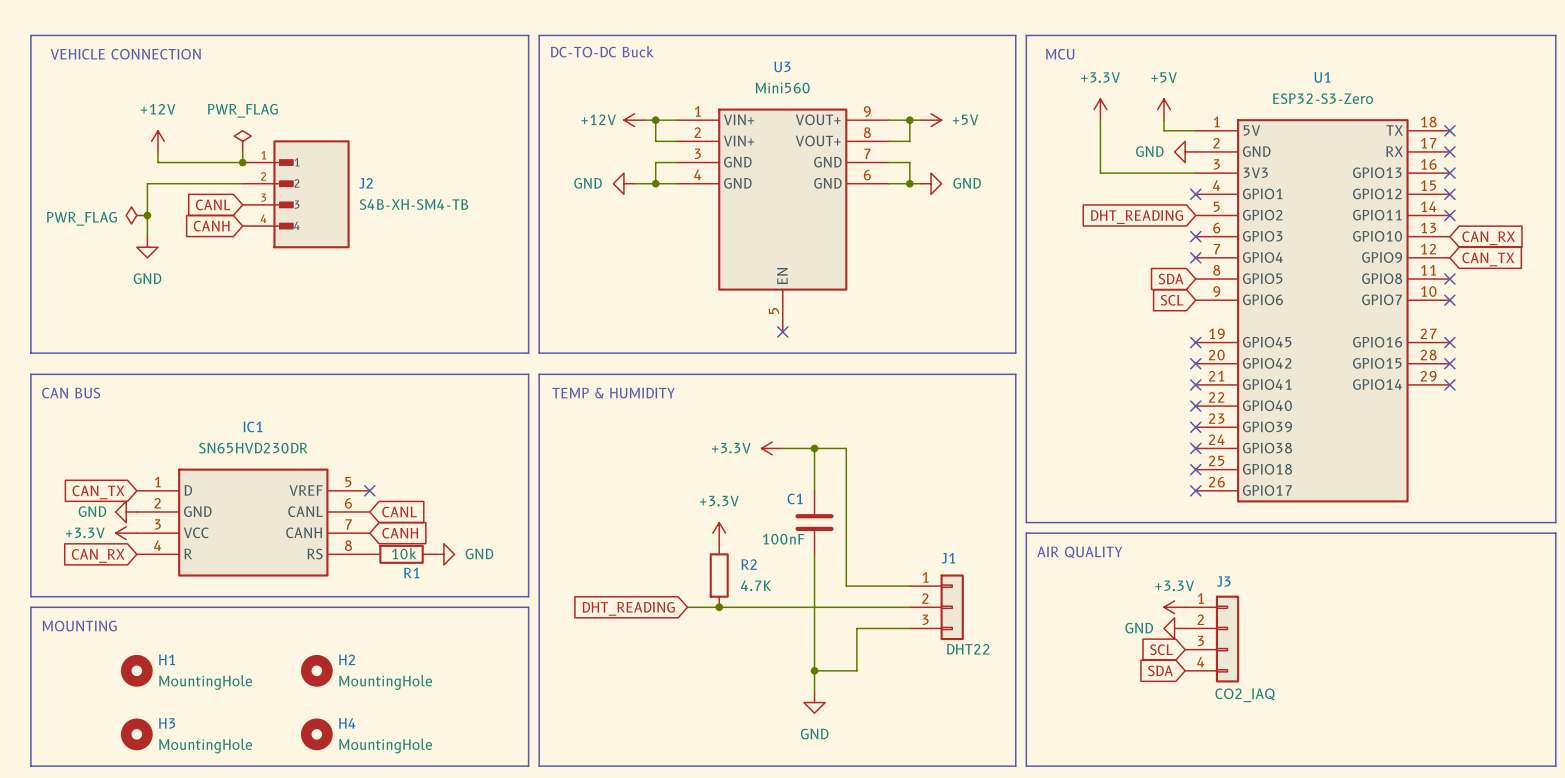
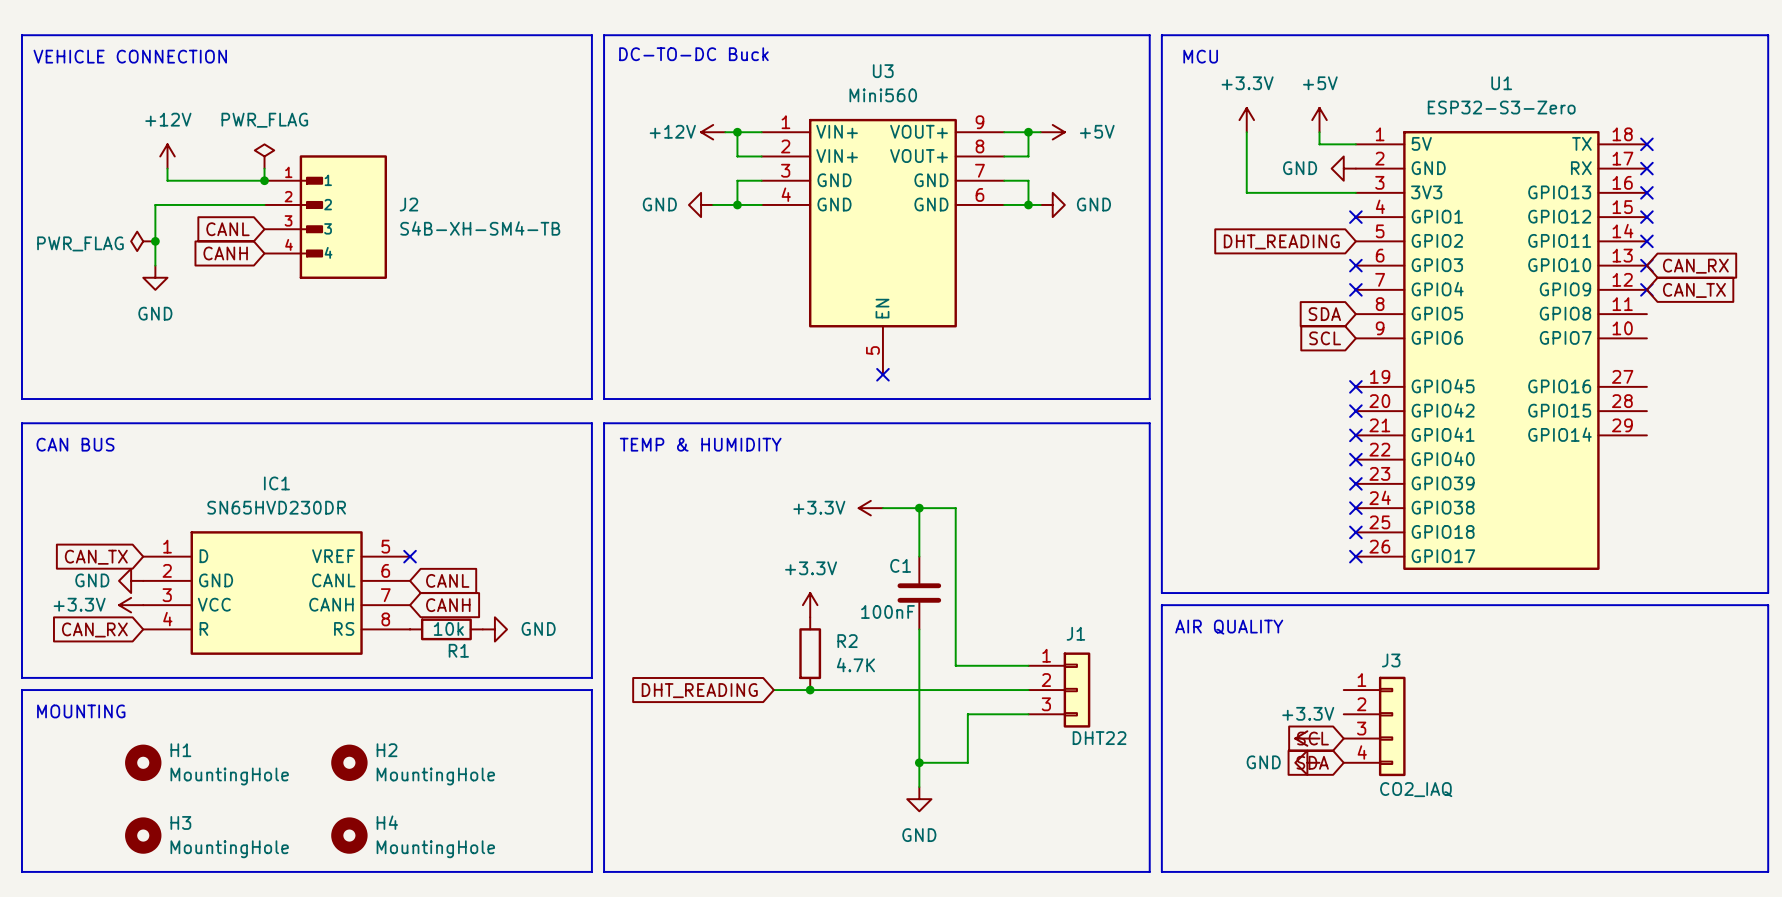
no-connect mark: none -> (1646, 265)
no-connect mark: none -> (1646, 289)
no-connect mark: (1449, 279) -> none
no-connect mark: (1449, 300) -> none
no-connect mark: (1449, 342) -> none
no-connect mark: (1449, 363) -> none
no-connect mark: (1449, 384) -> none
power symbol position: +3.3V (1174, 607) -> +3.3V (1307, 738)
power symbol position: GND (1174, 628) -> GND (1307, 762)

